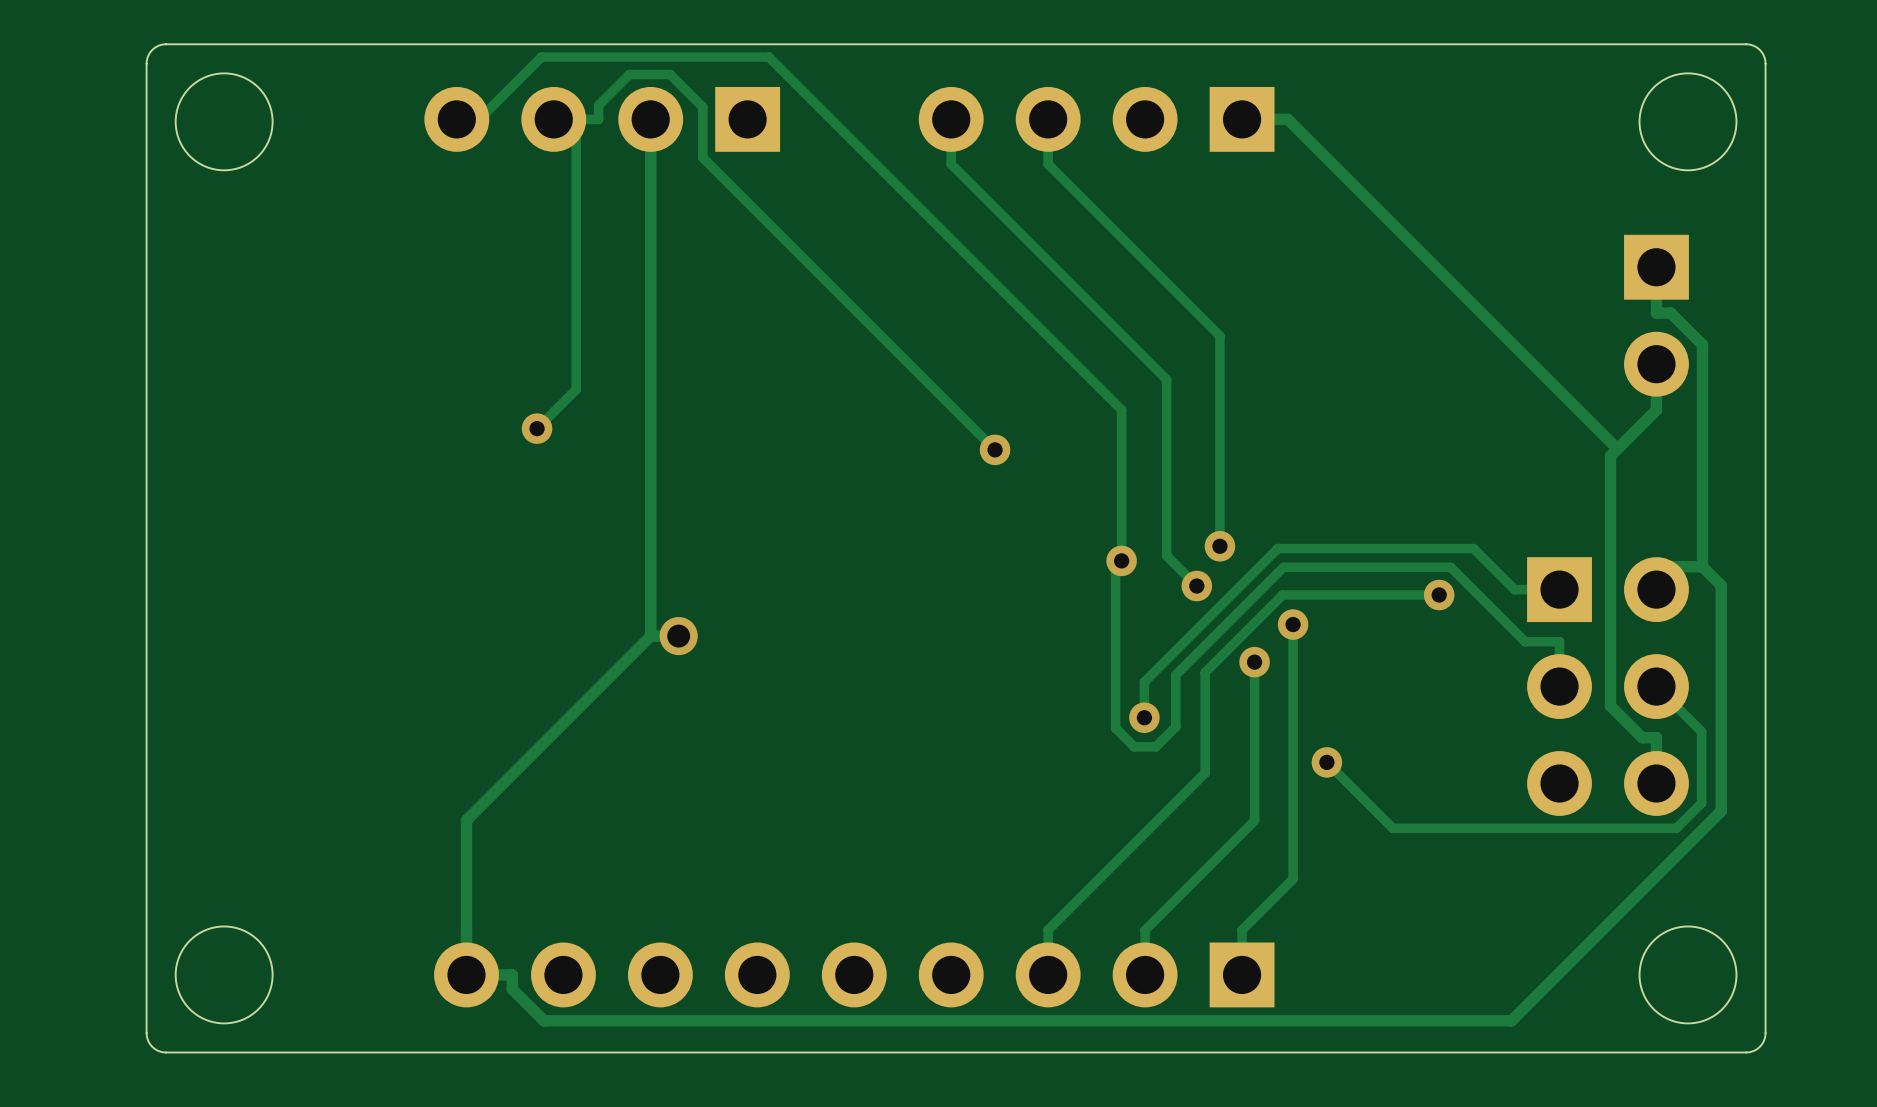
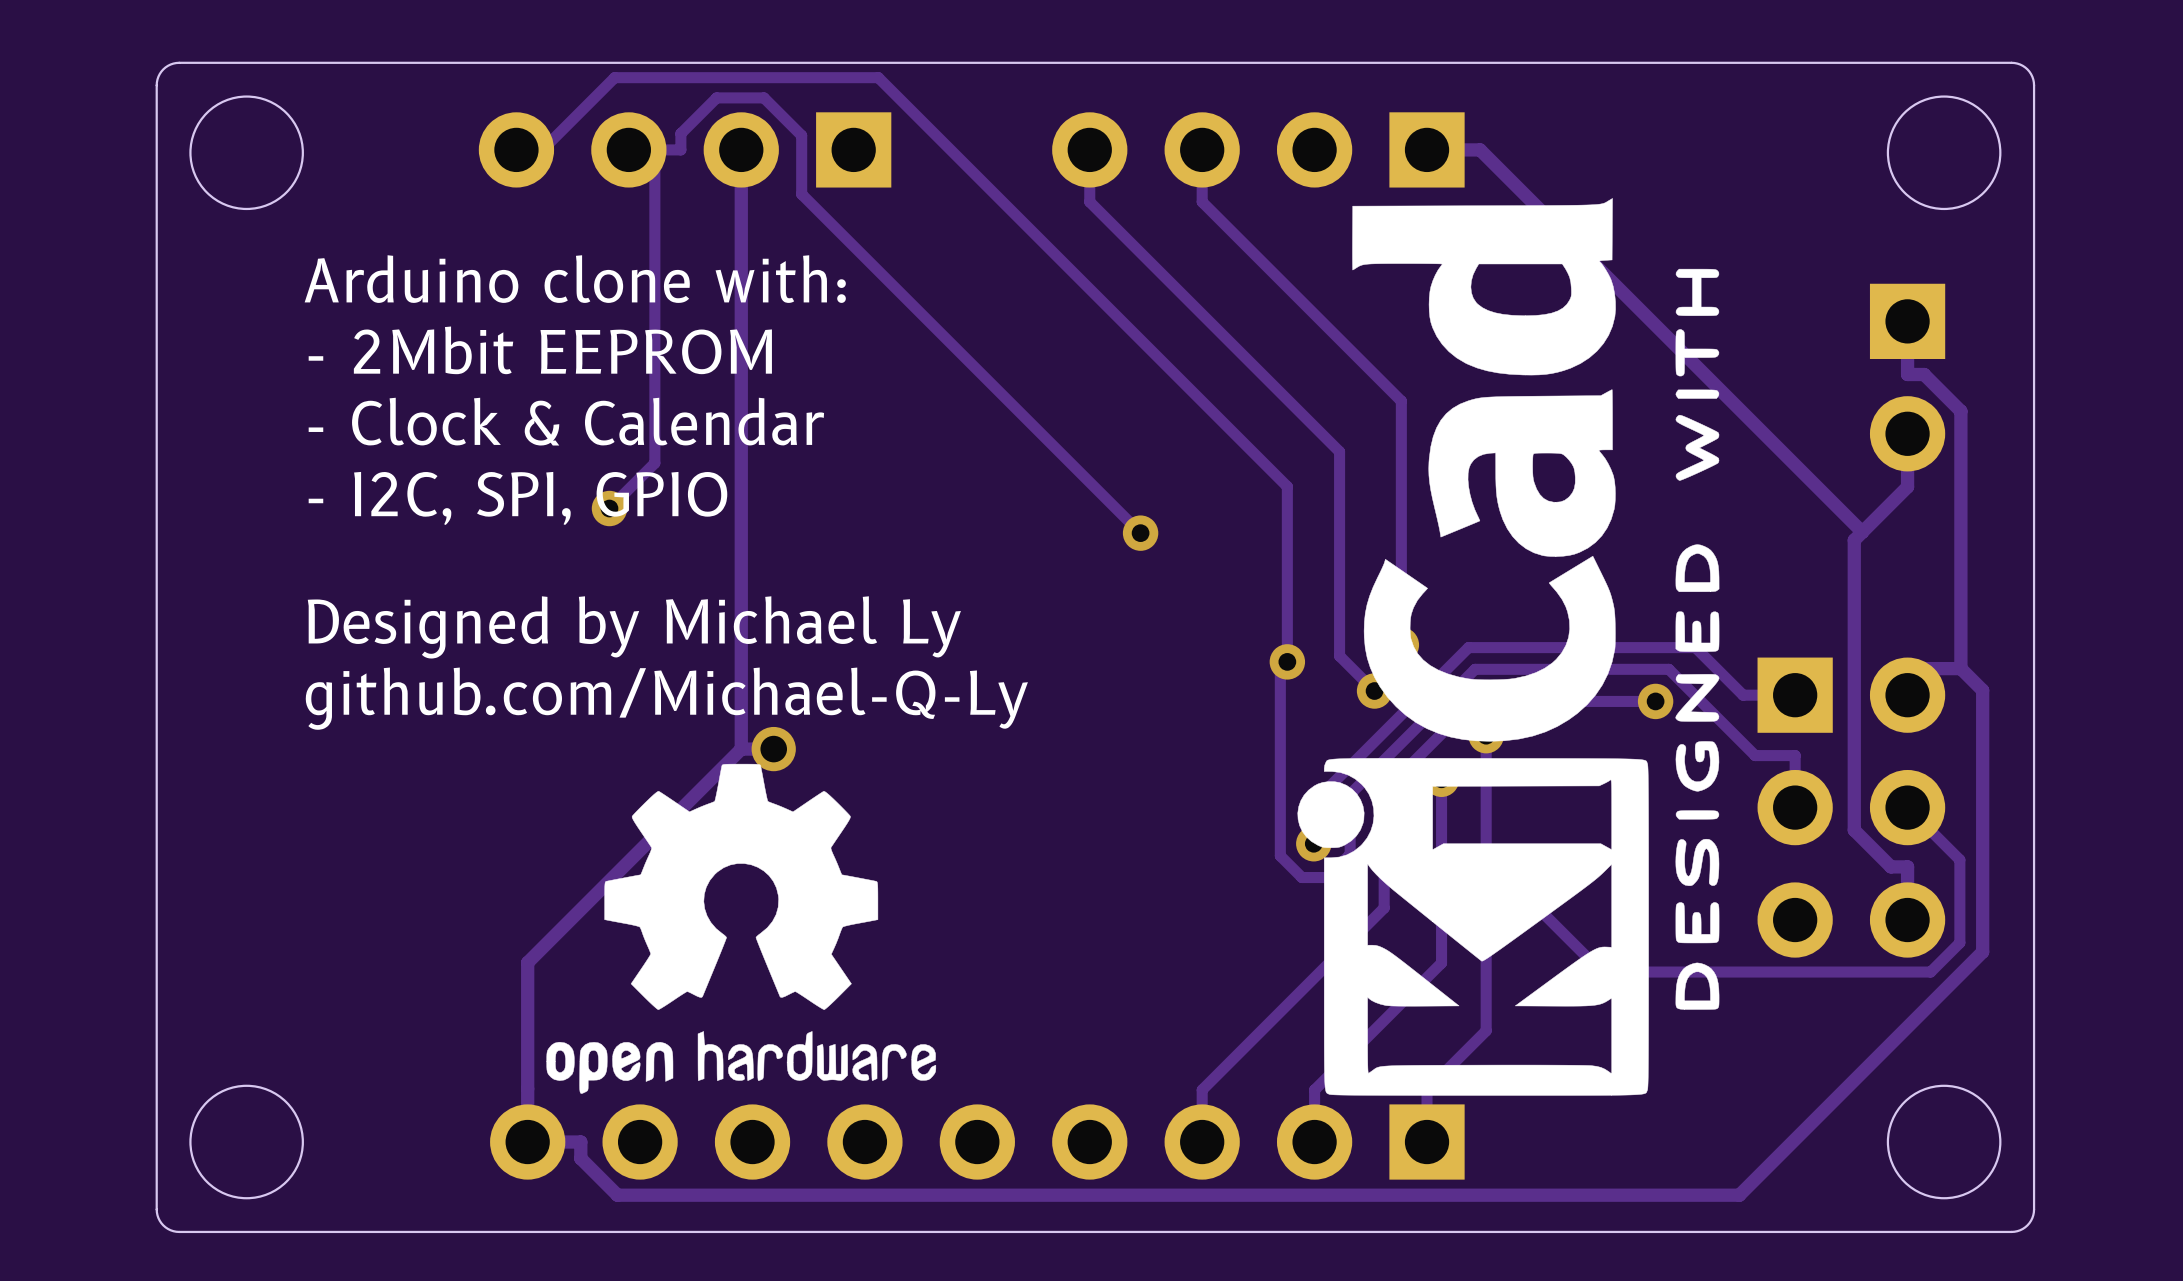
drawing: none -> [1297, 198, 1720, 1096]
text: none -> Arduino clone with: (575, 279)
text: none -> - 2Mbit EEPROM (540, 350)
text: none -> - Clock & Calendar (566, 421)
text: none -> - I2C, SPI, GPIO (517, 498)
text: none -> Designed by Michael Ly (634, 627)
text: none -> github.com/Michael-Q-Ly (666, 698)
drawing: none -> [546, 763, 937, 1094]

